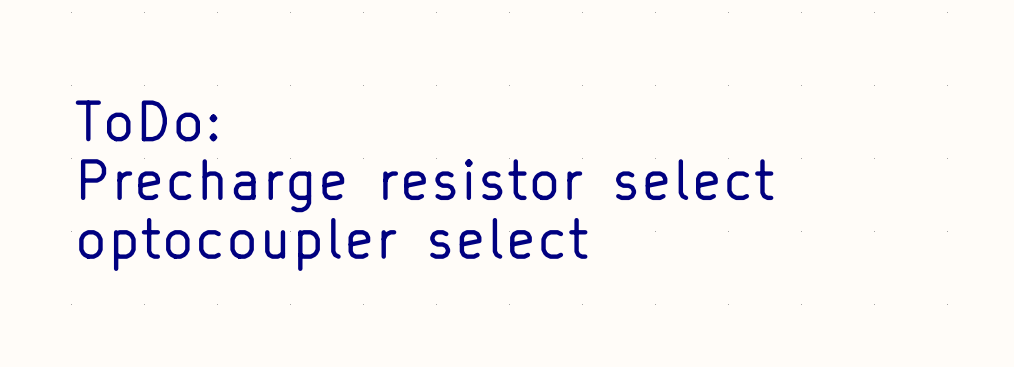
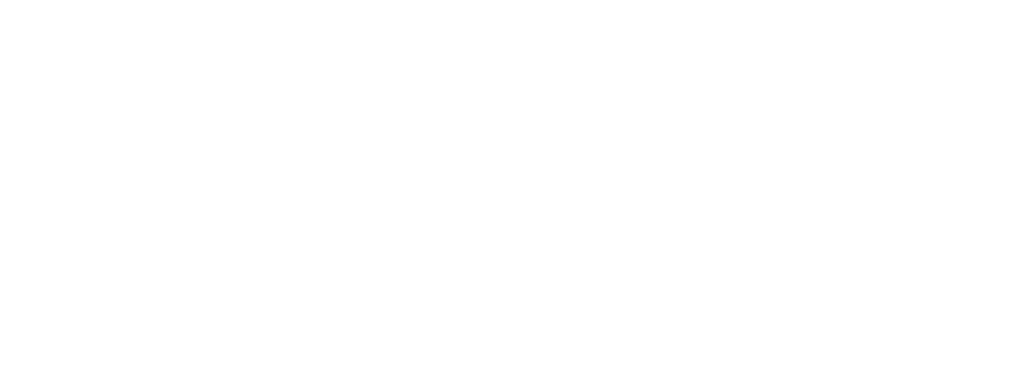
text: ToDo: (146, 120) -> none
text: Precharge resistor select (427, 185) -> none
text: optocoupler select (333, 244) -> none

